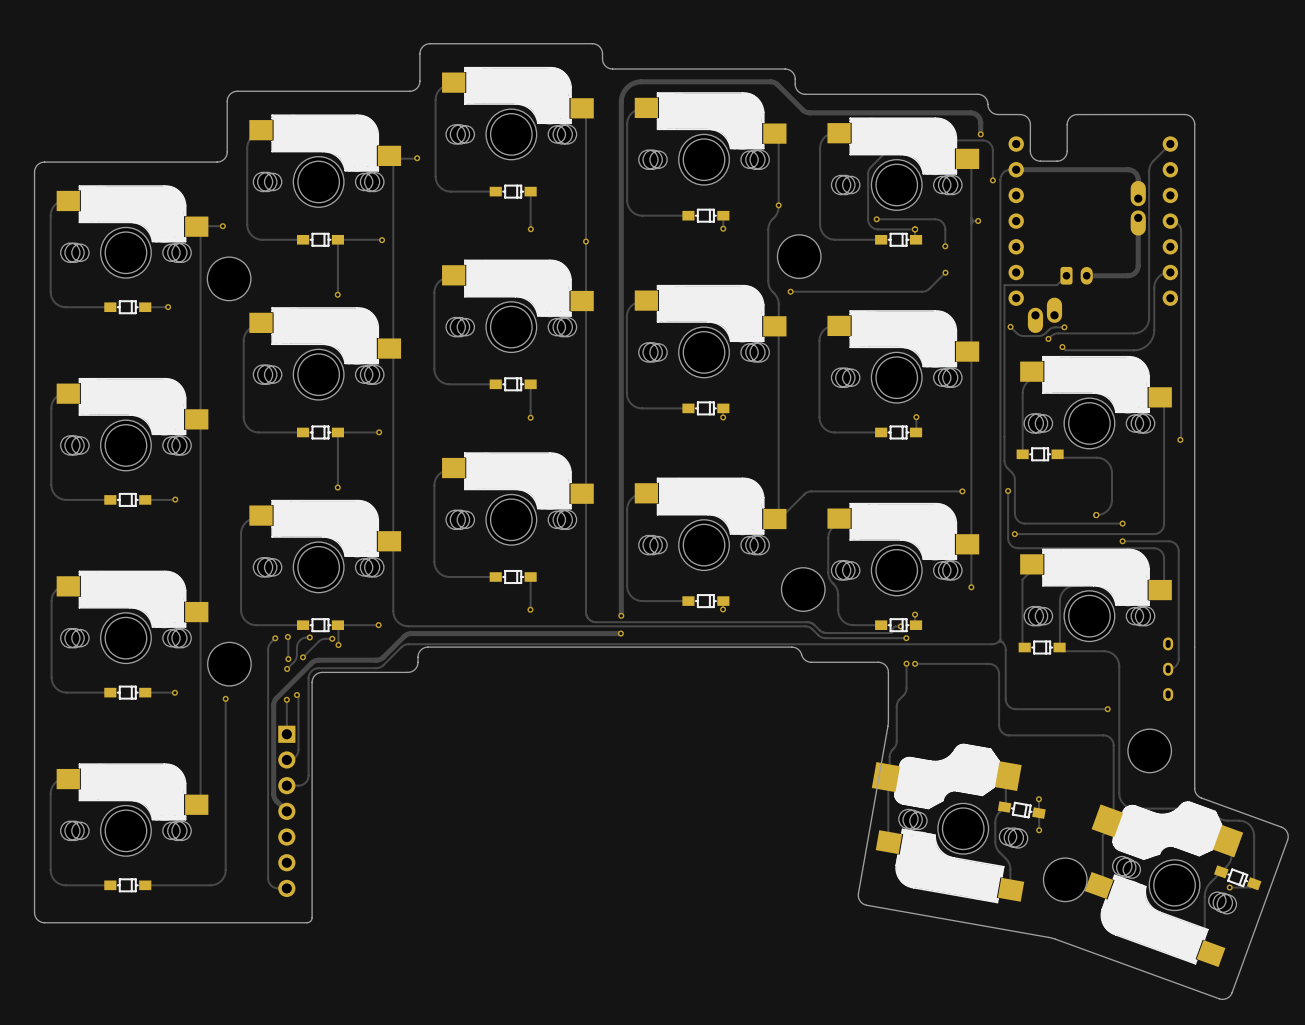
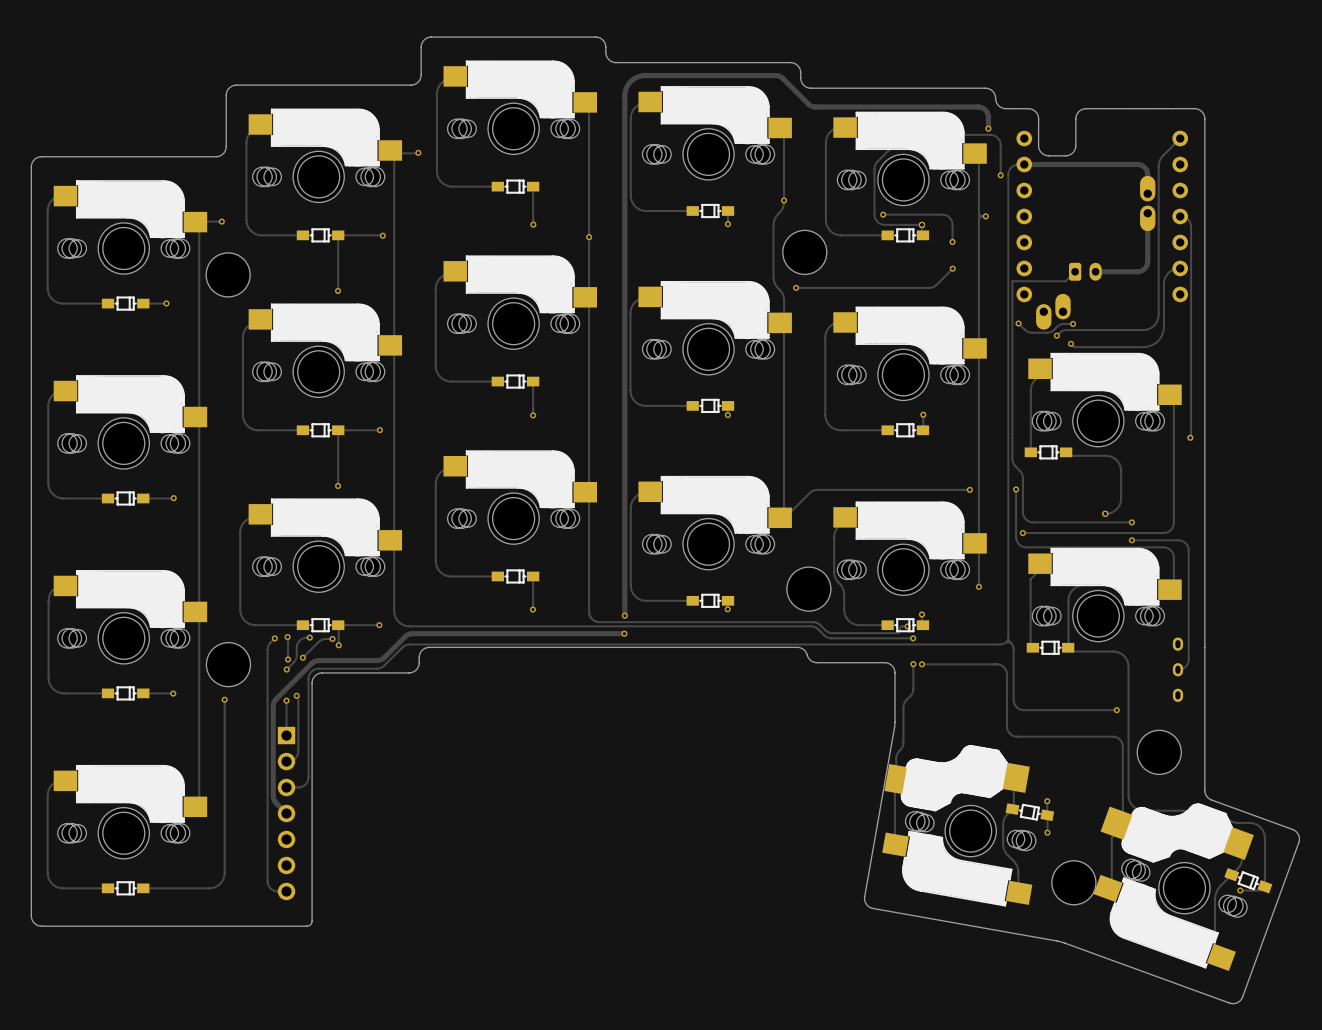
part footprint: [871, 743, 1028, 904] -> [882, 745, 1036, 907]

